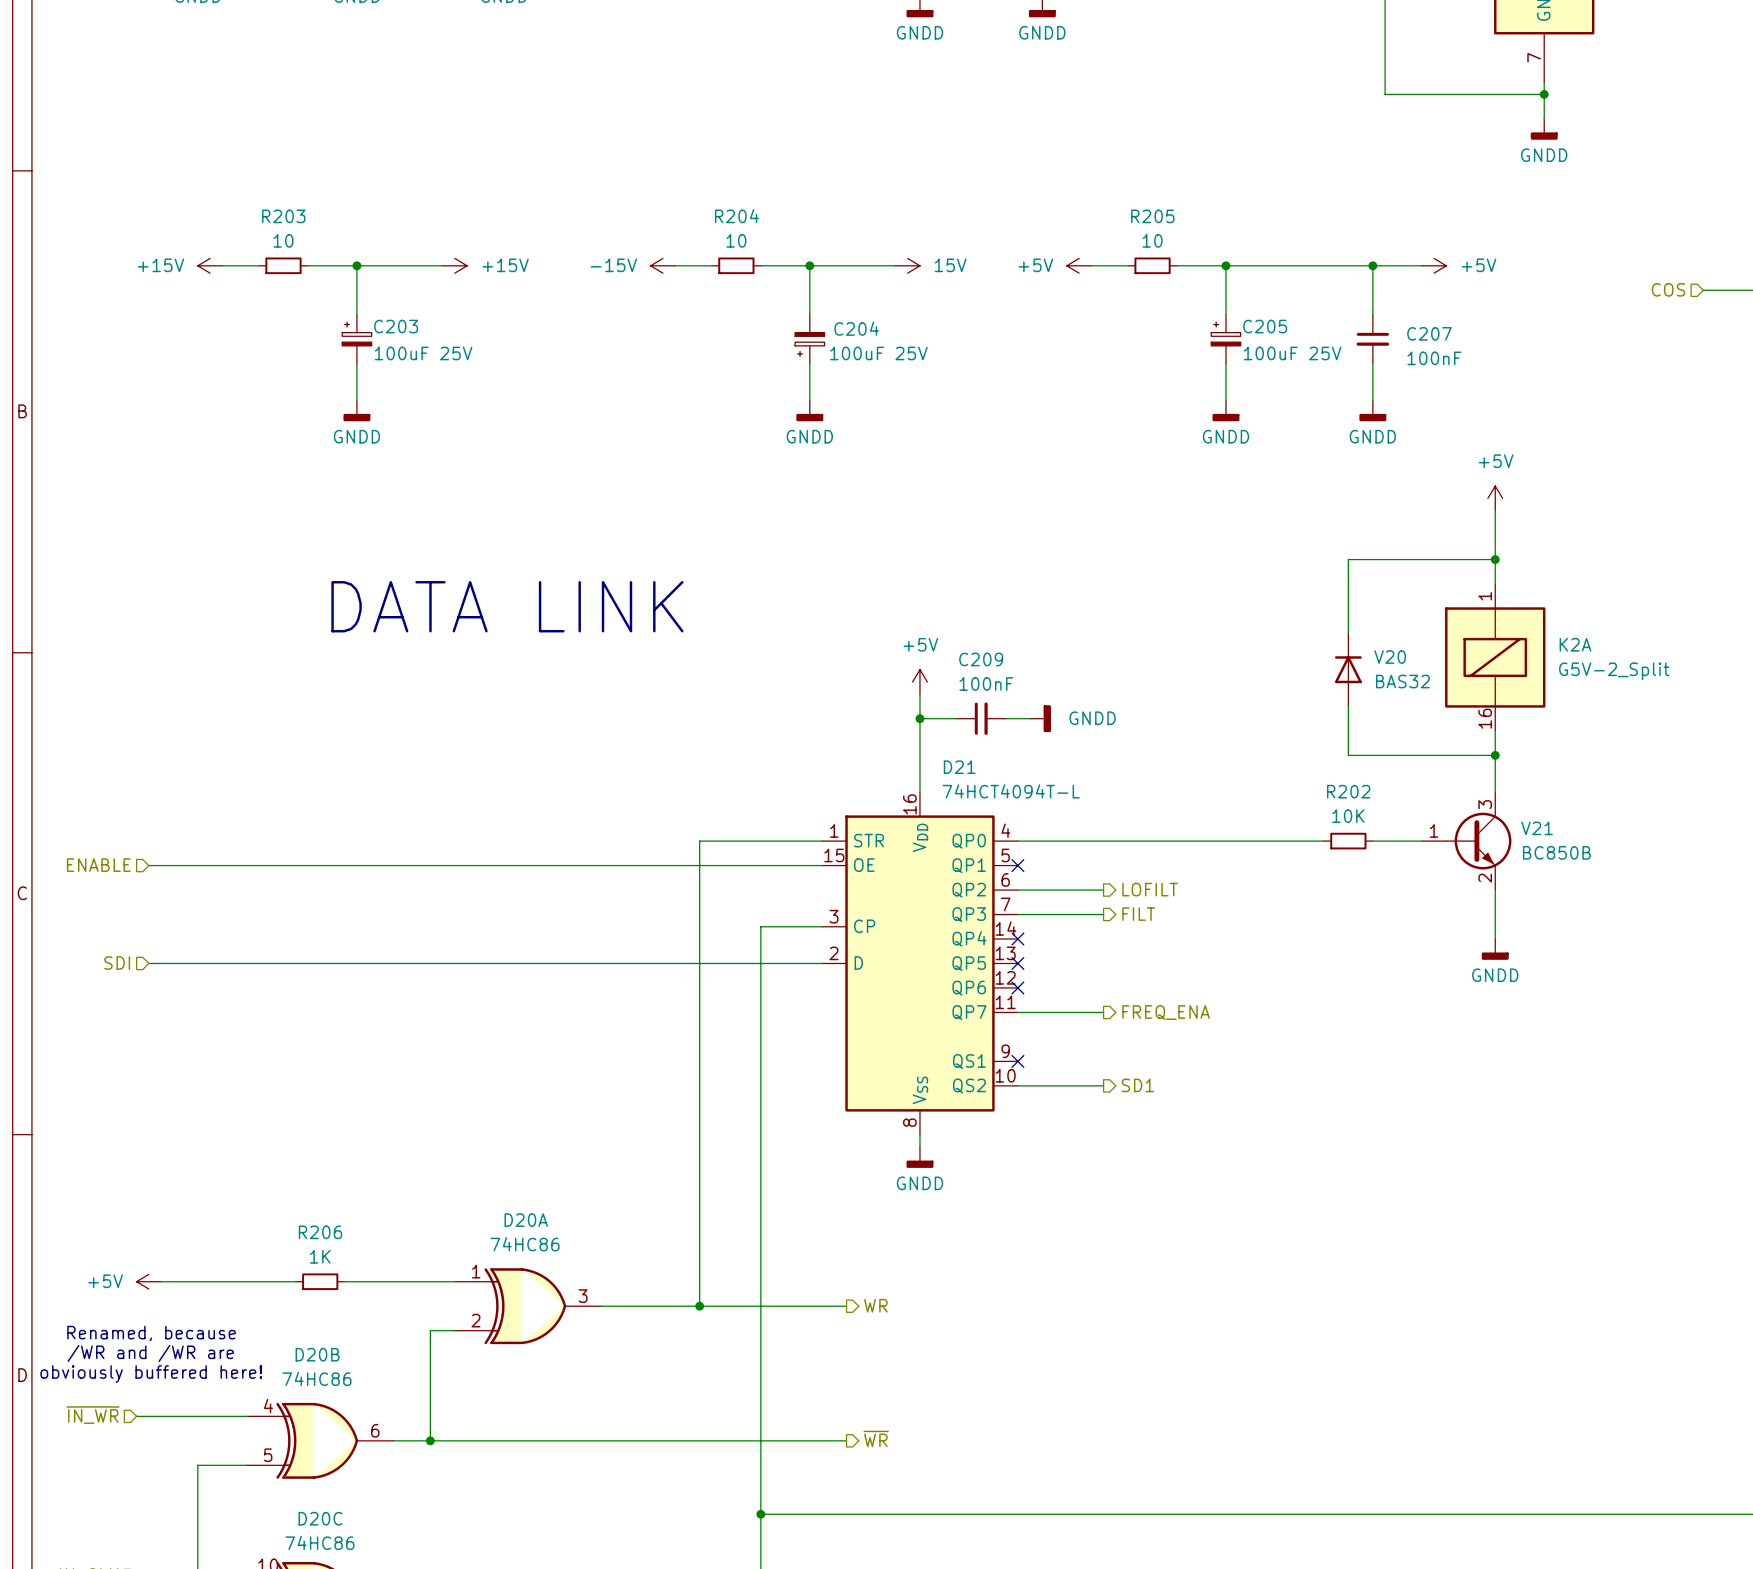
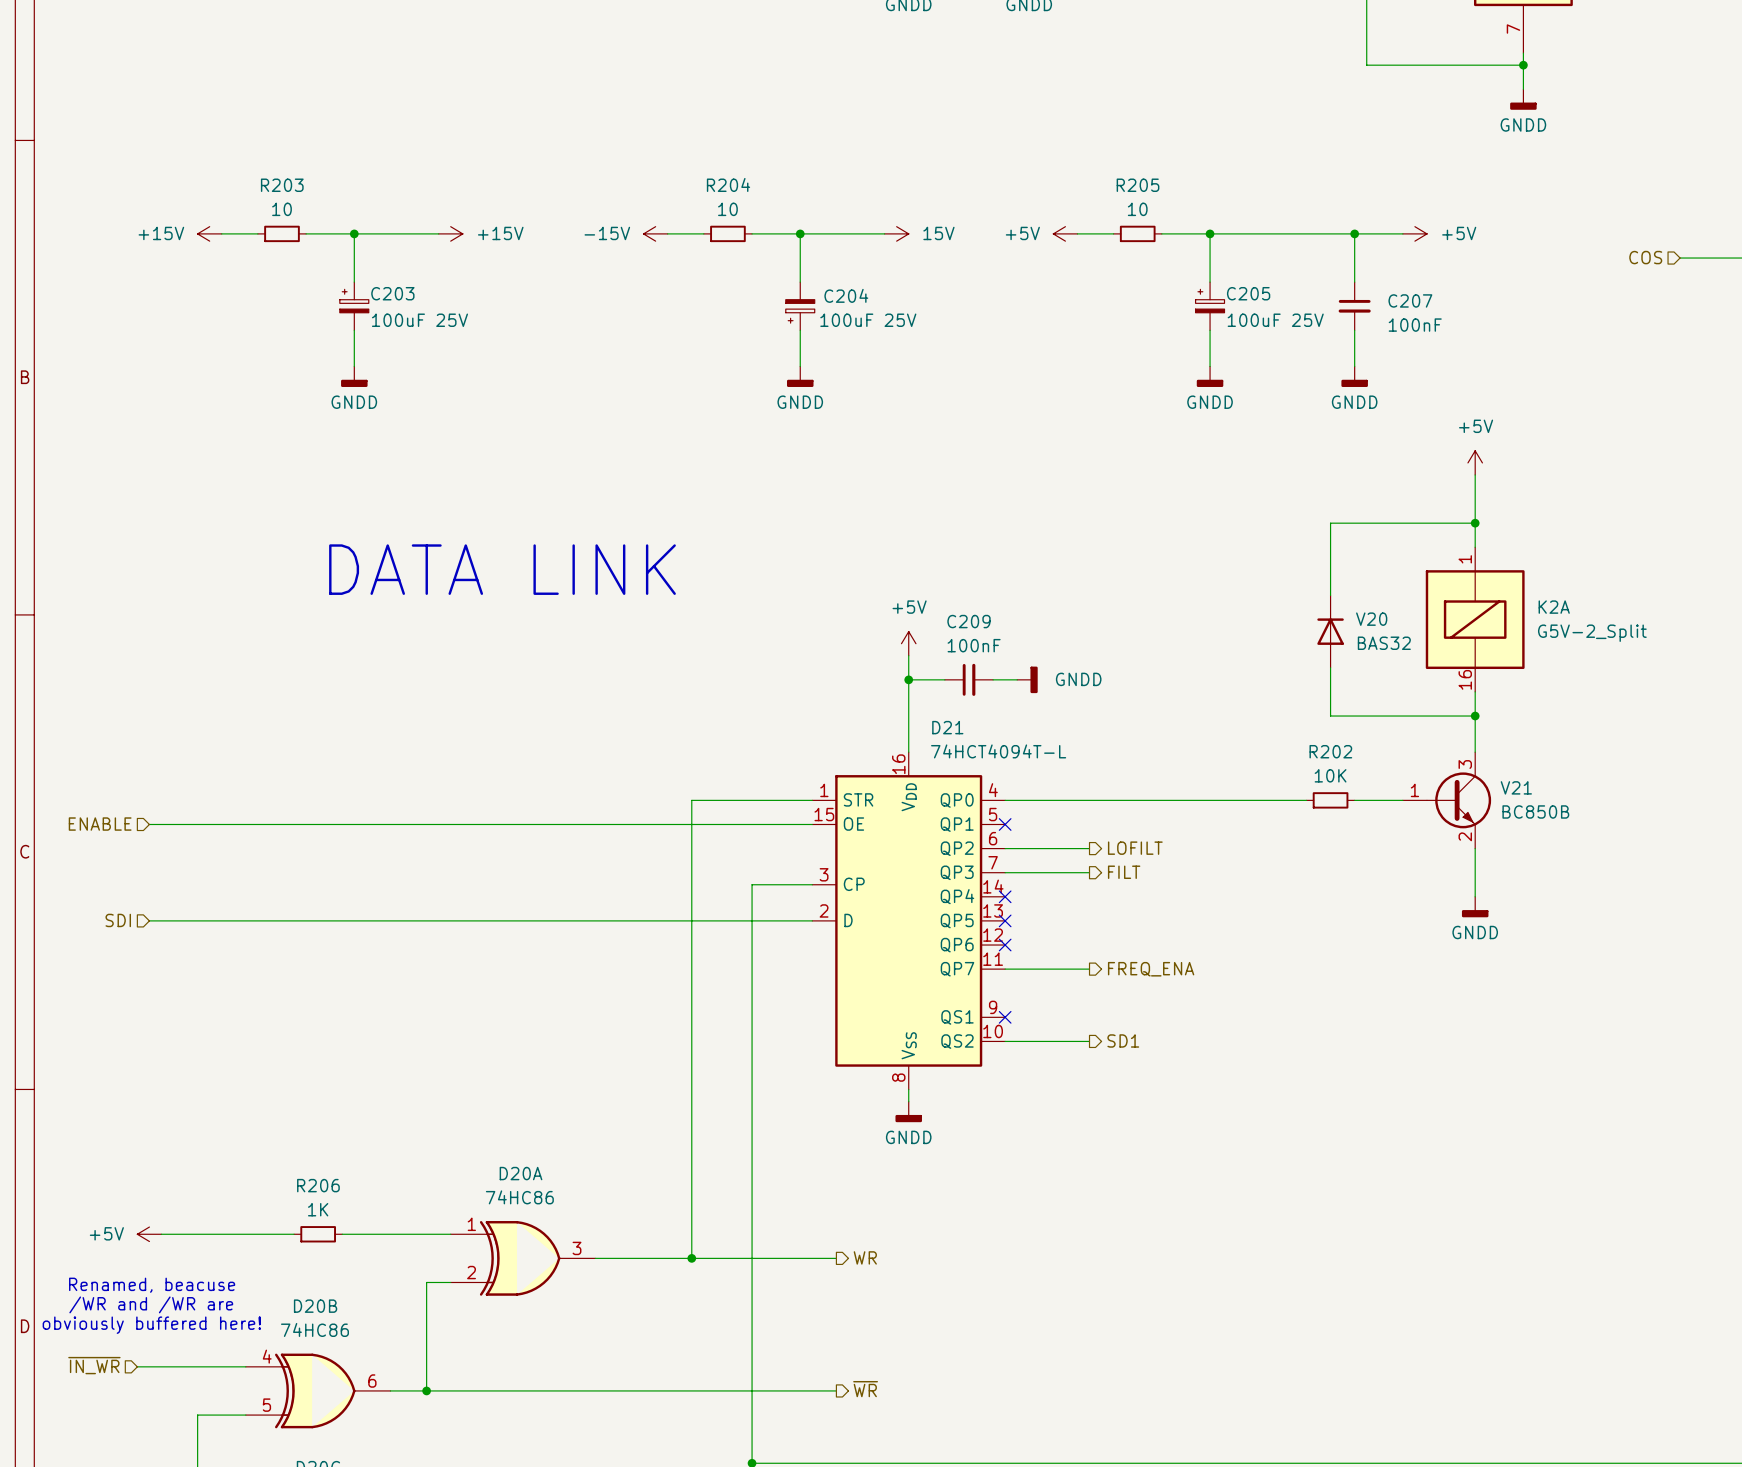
text: Renamed, because (151, 1333) -> Renamed, beacuse (152, 1285)

